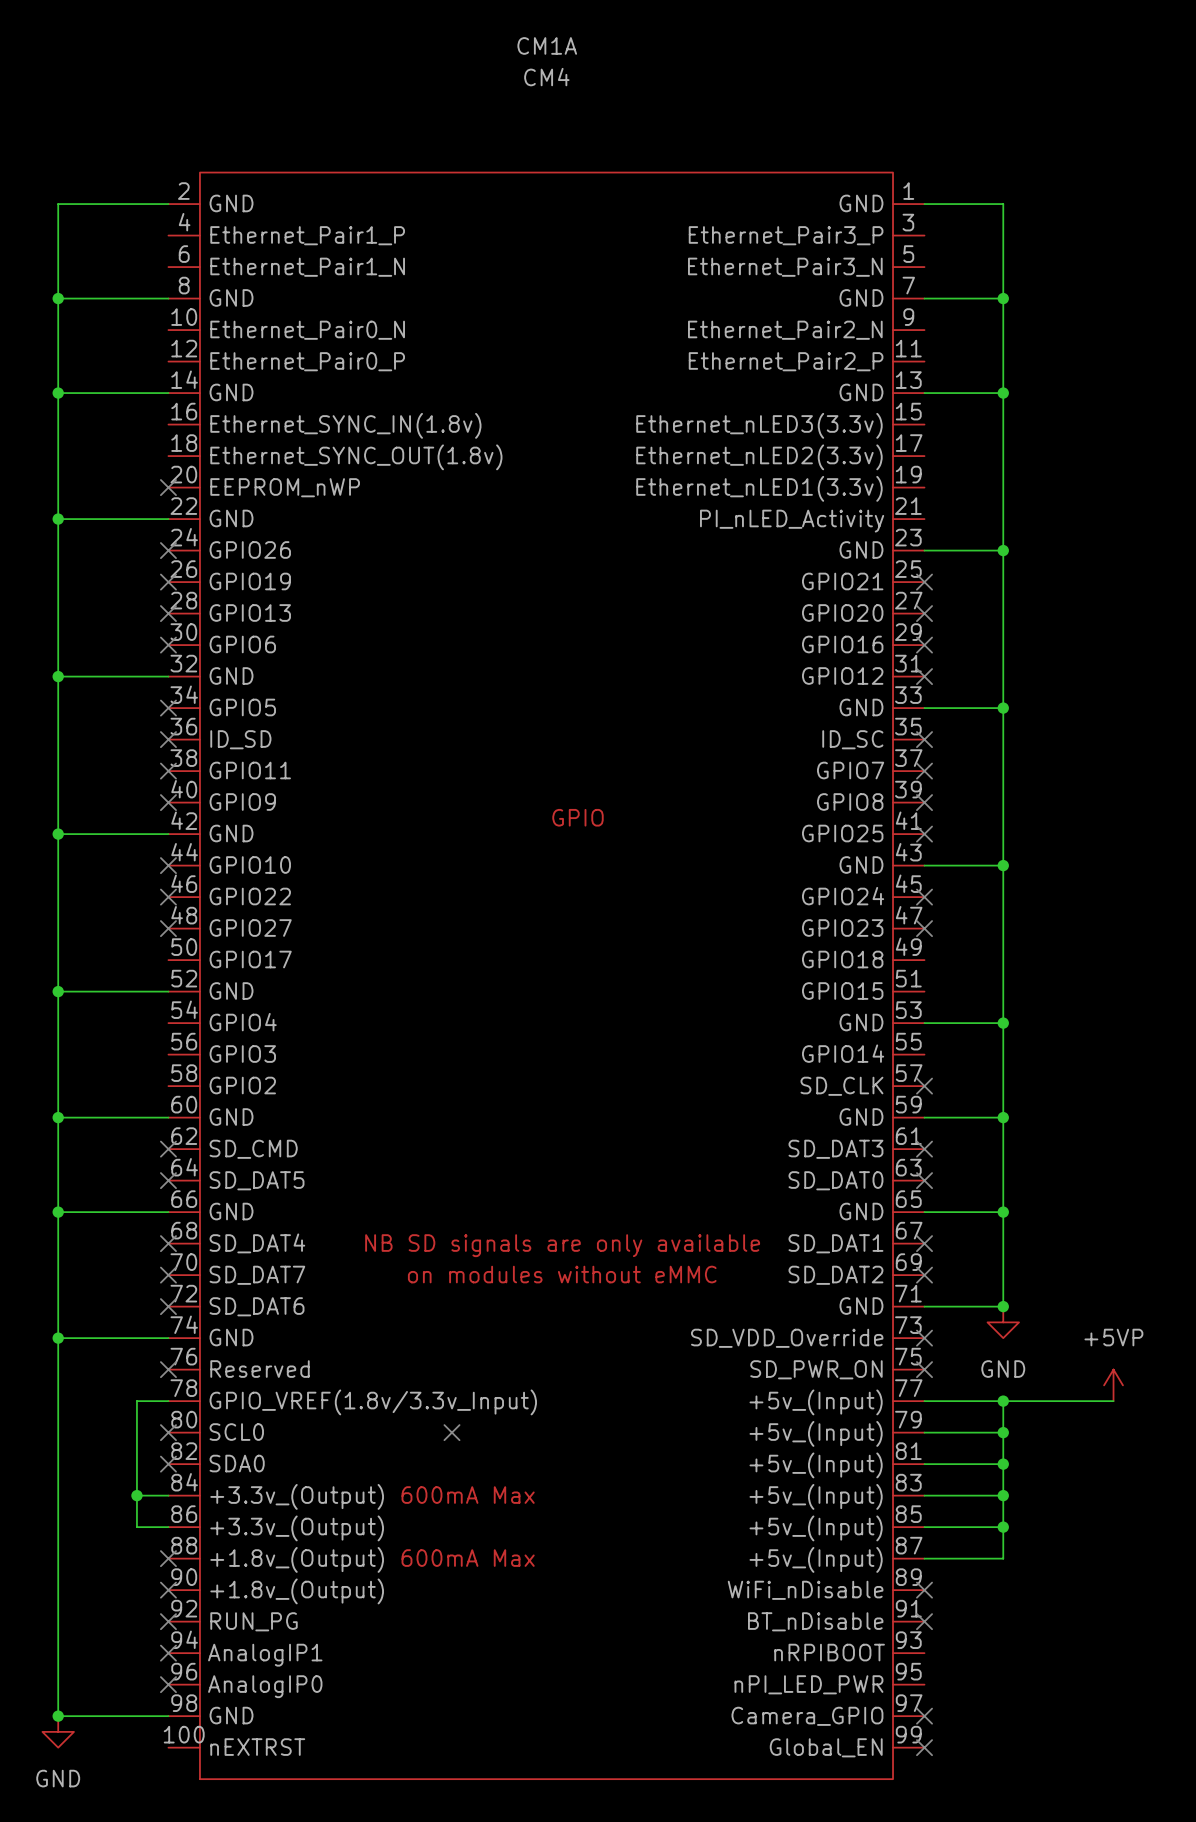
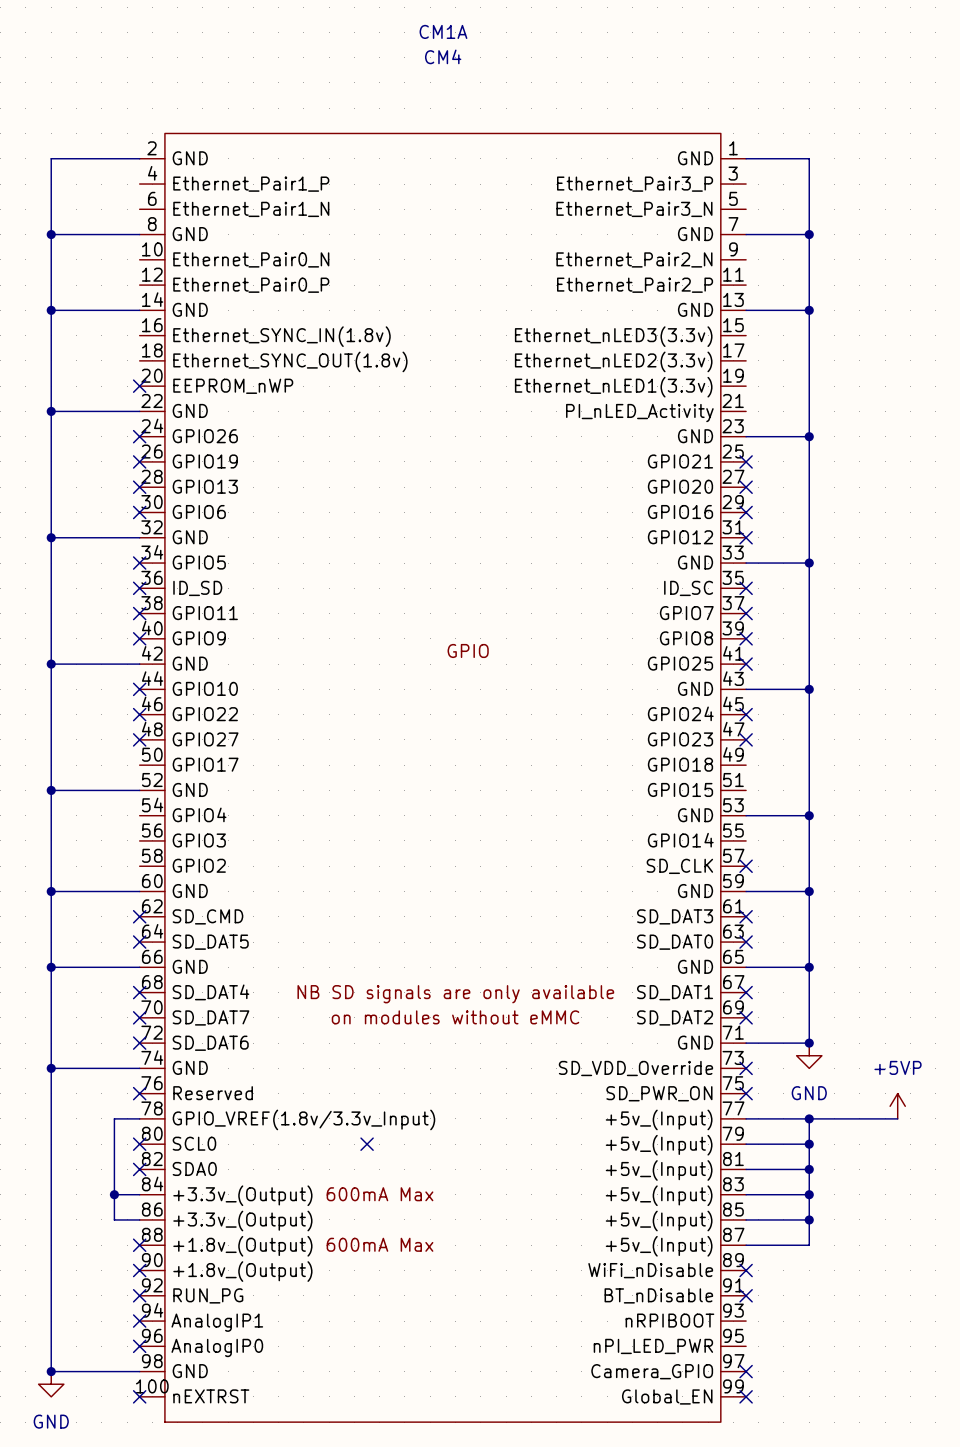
no-connect mark: none -> (139, 1396)

